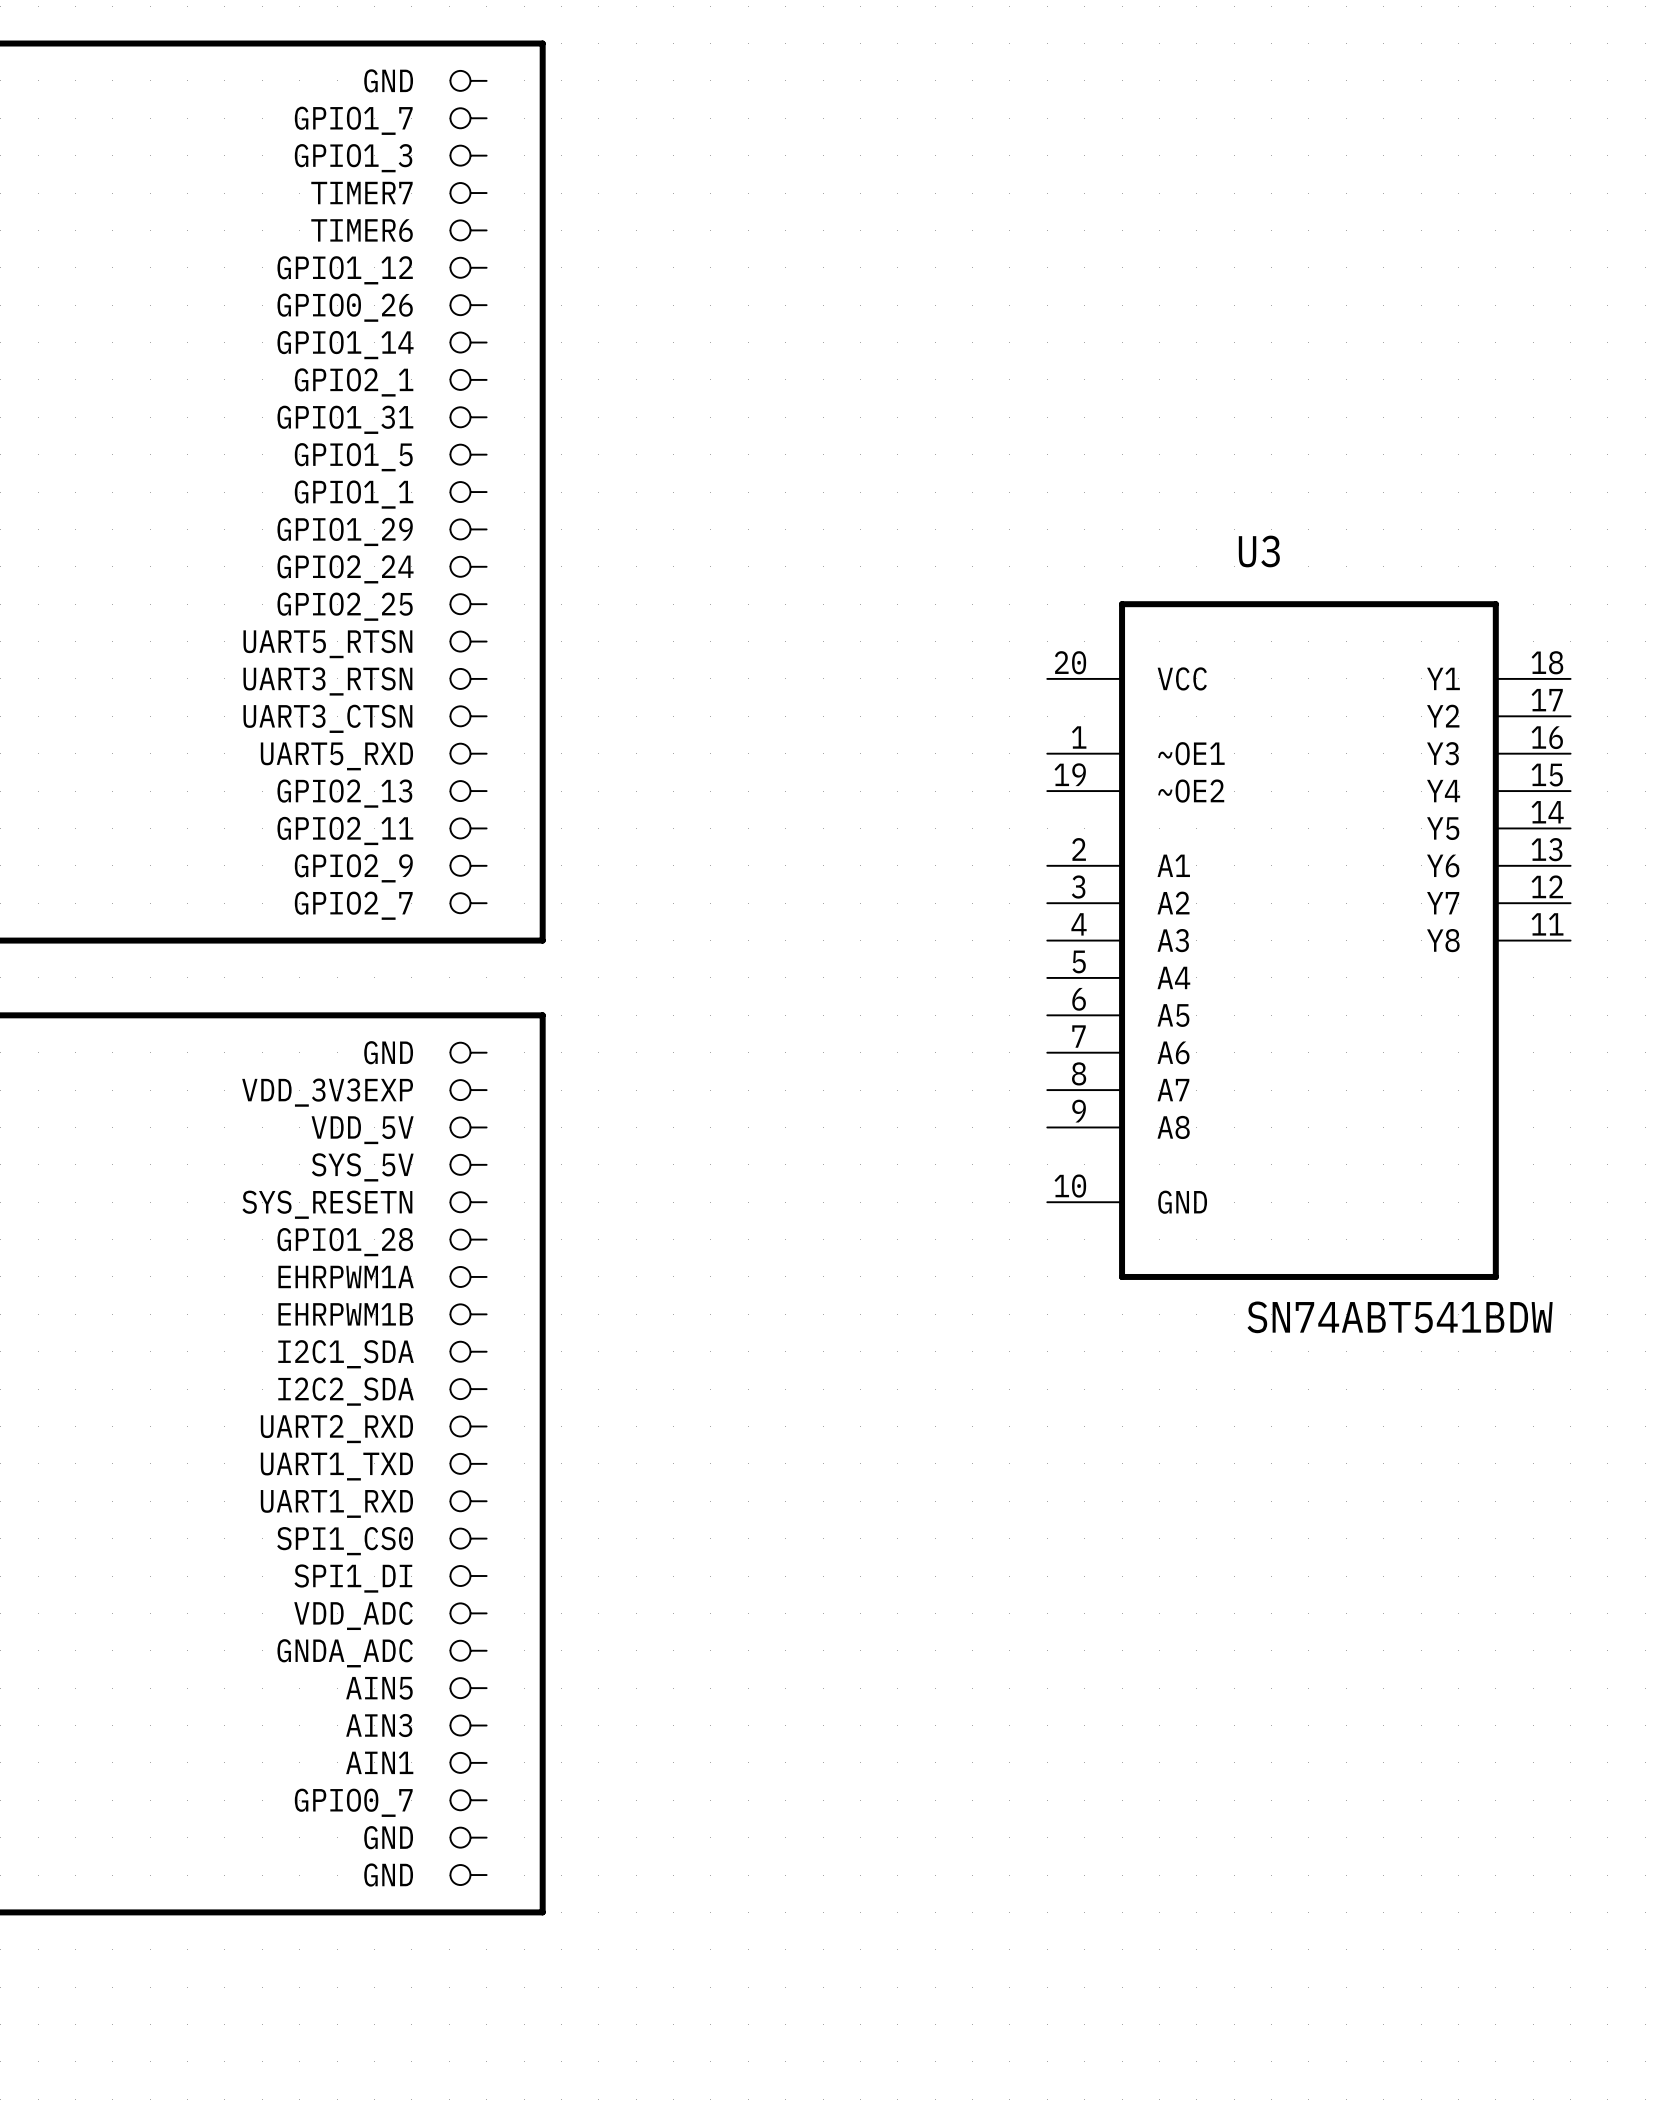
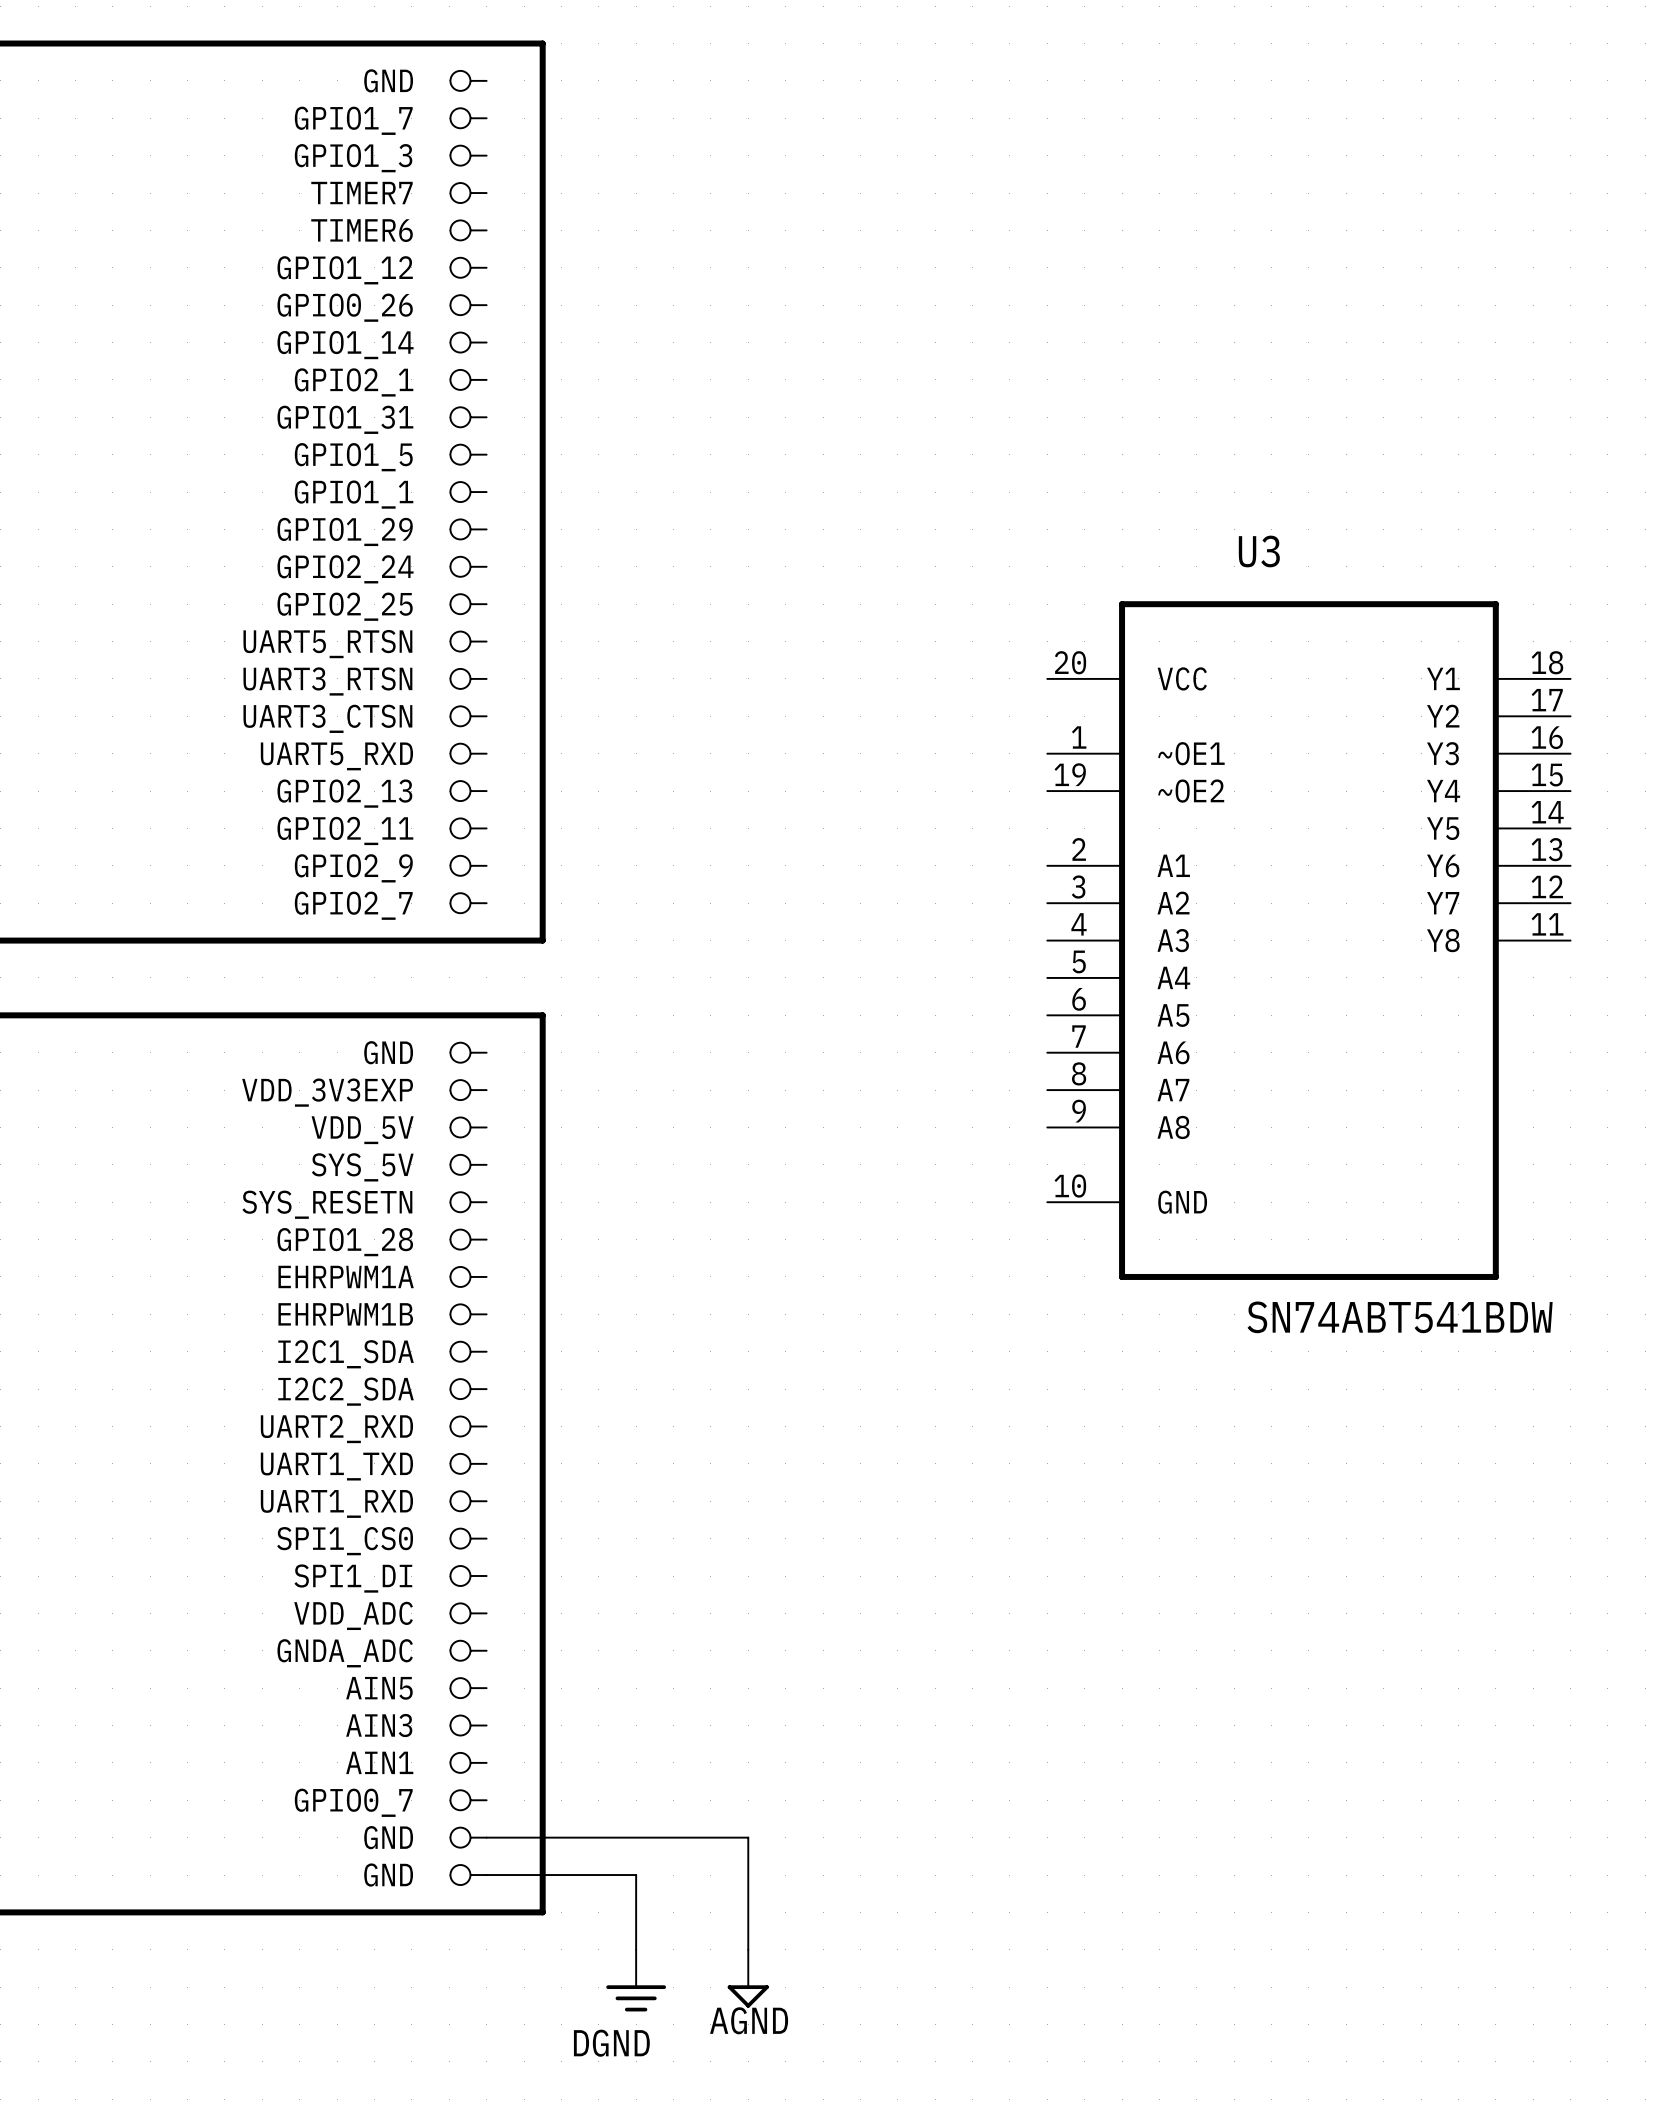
wire: none -> (486, 1837) (748, 1837) (748, 1949)
wire: none -> (486, 1875) (636, 1875) (636, 1949)
power symbol: none -> AGND (748, 1978)
power symbol: none -> DGND (636, 1980)

